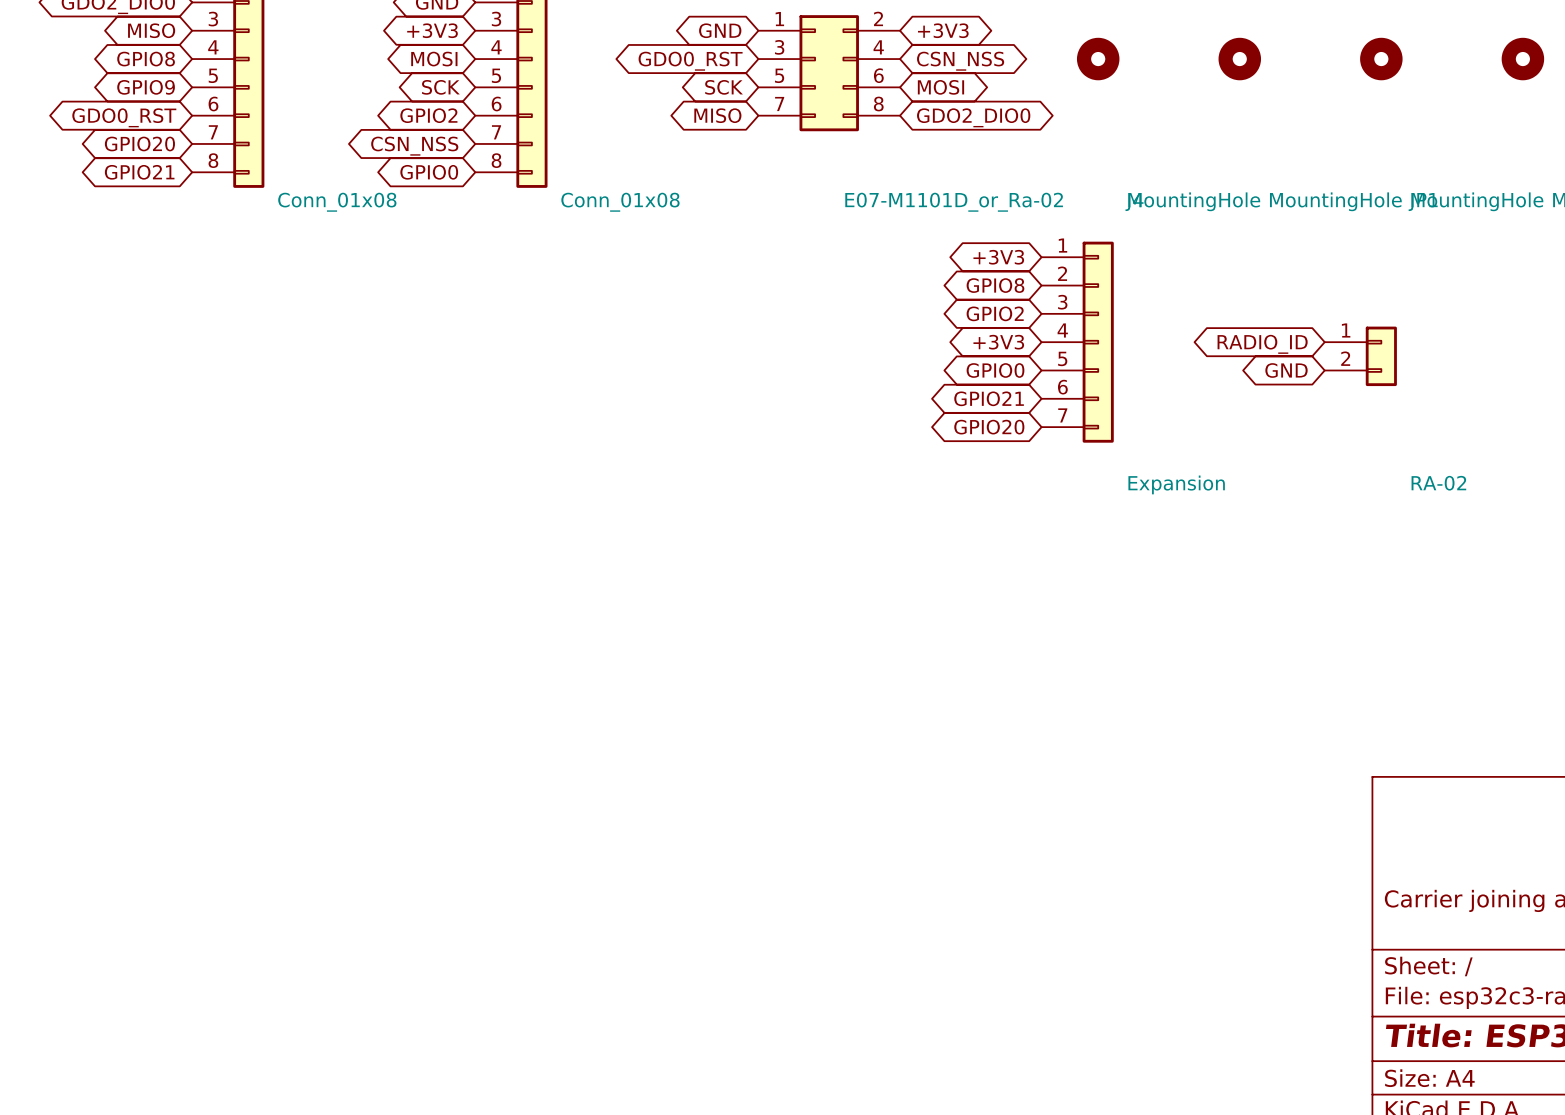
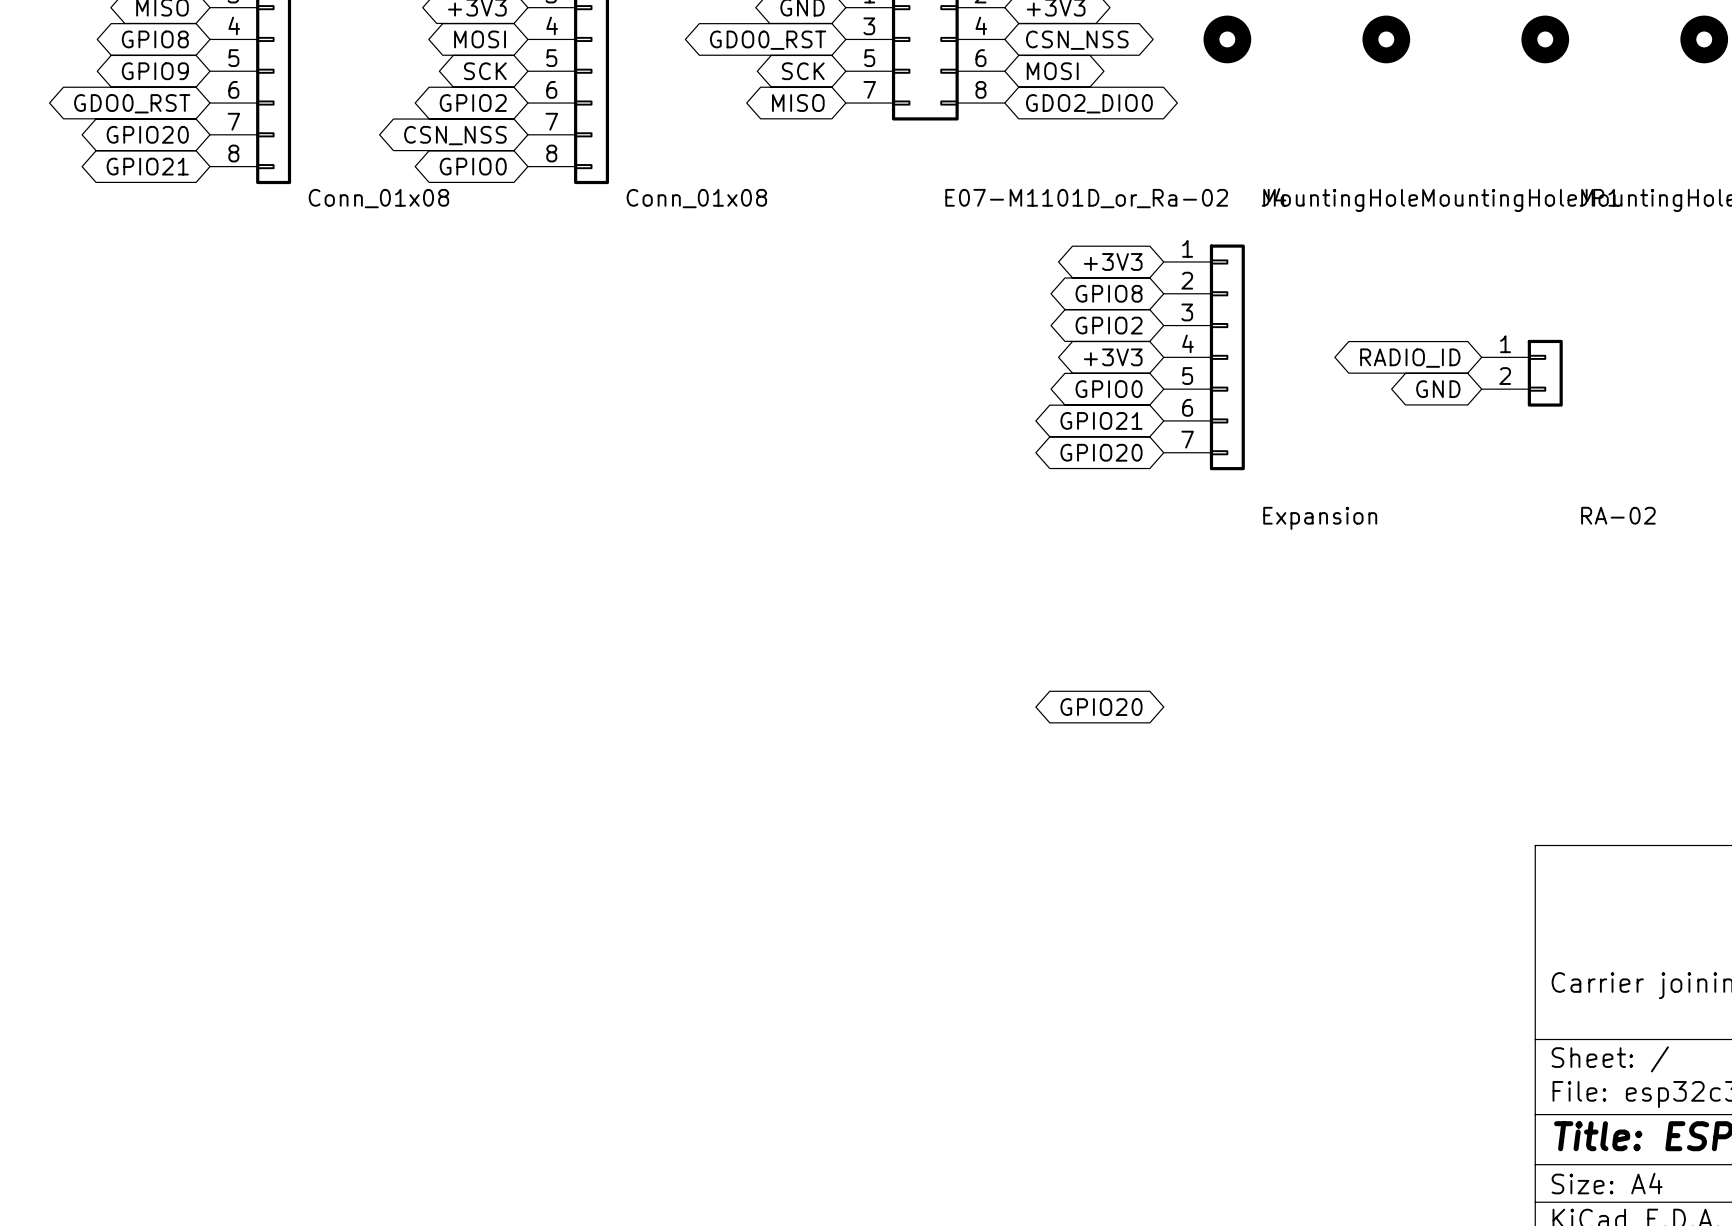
global label: none -> GPIO20 (1101, 707)

